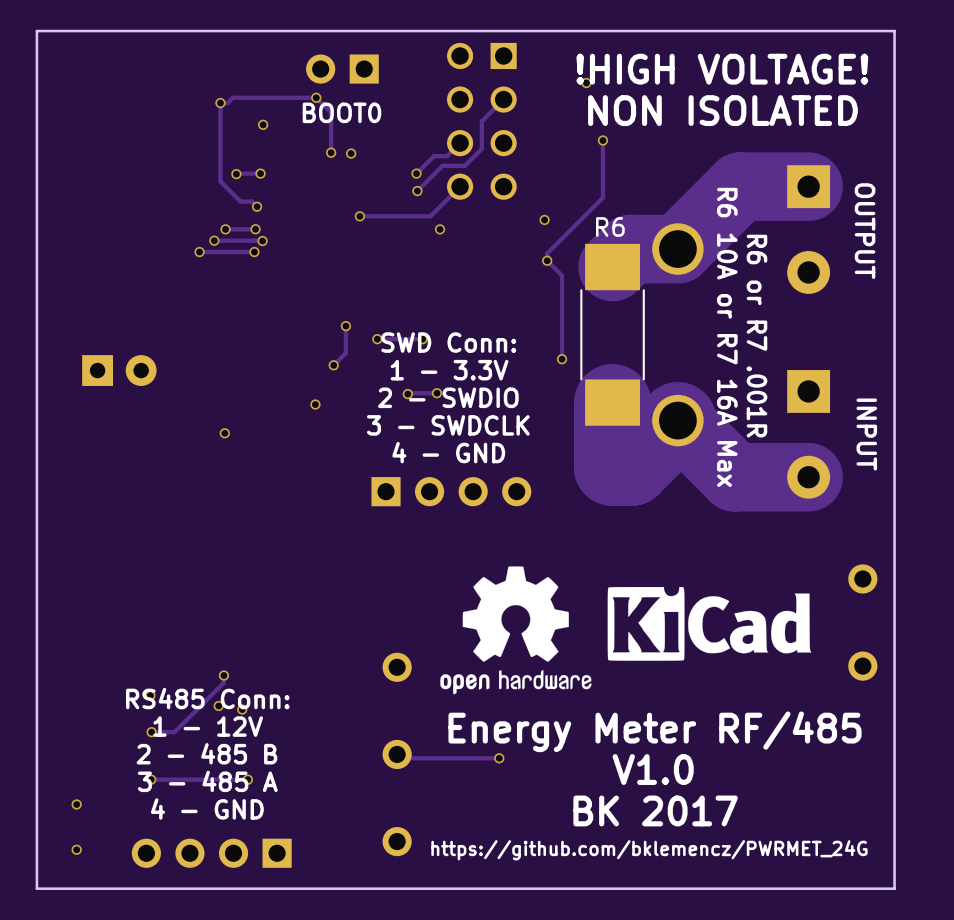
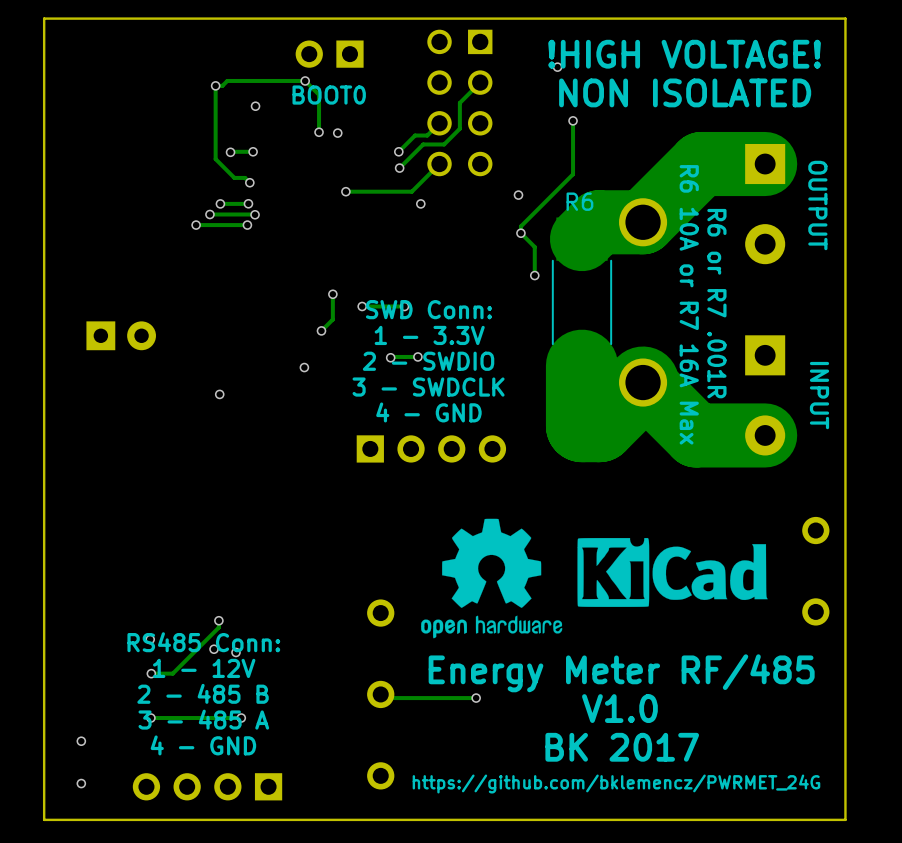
track: (562, 306) (562, 359) -> none
via position: (562, 359) -> (534, 275)

